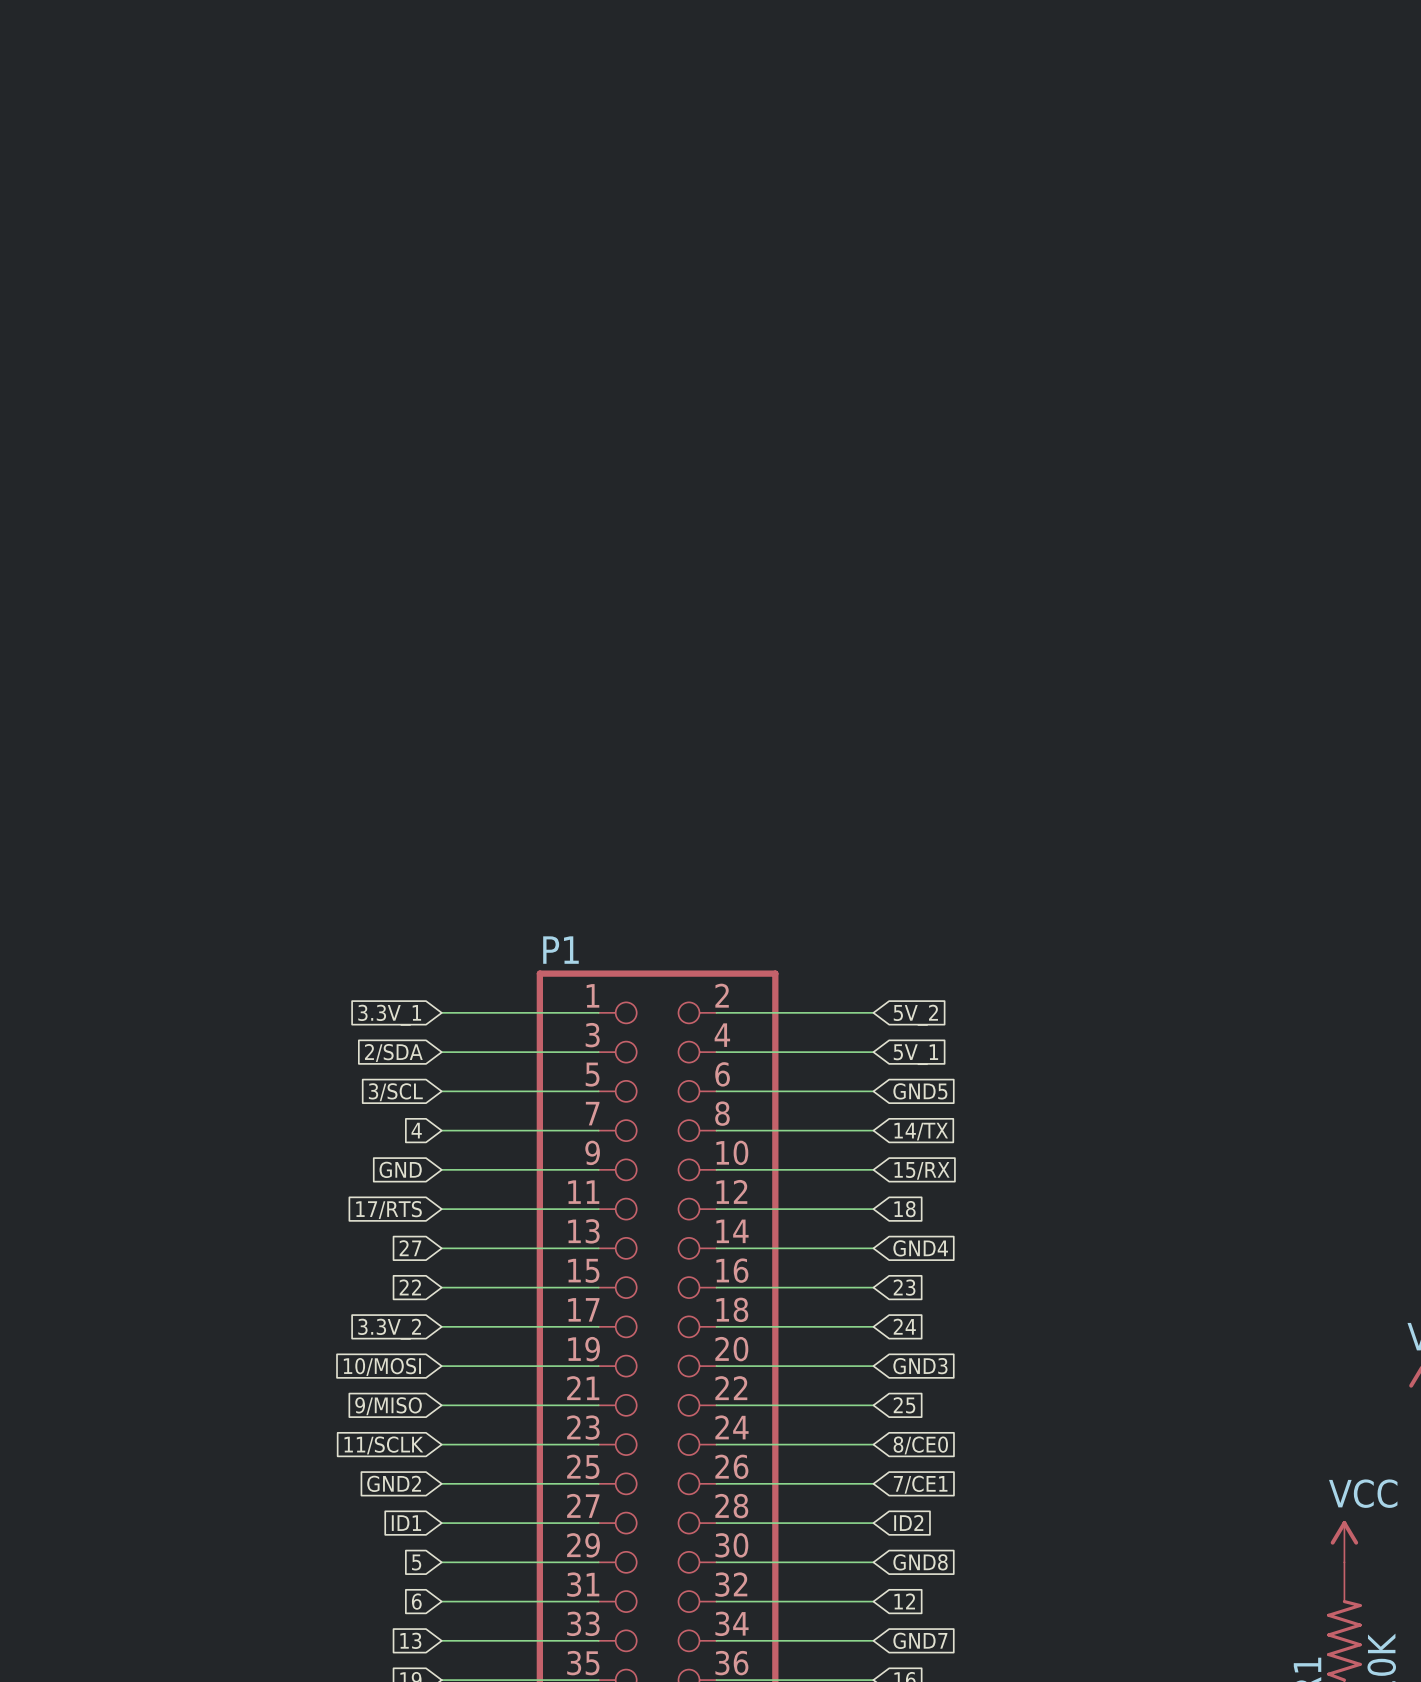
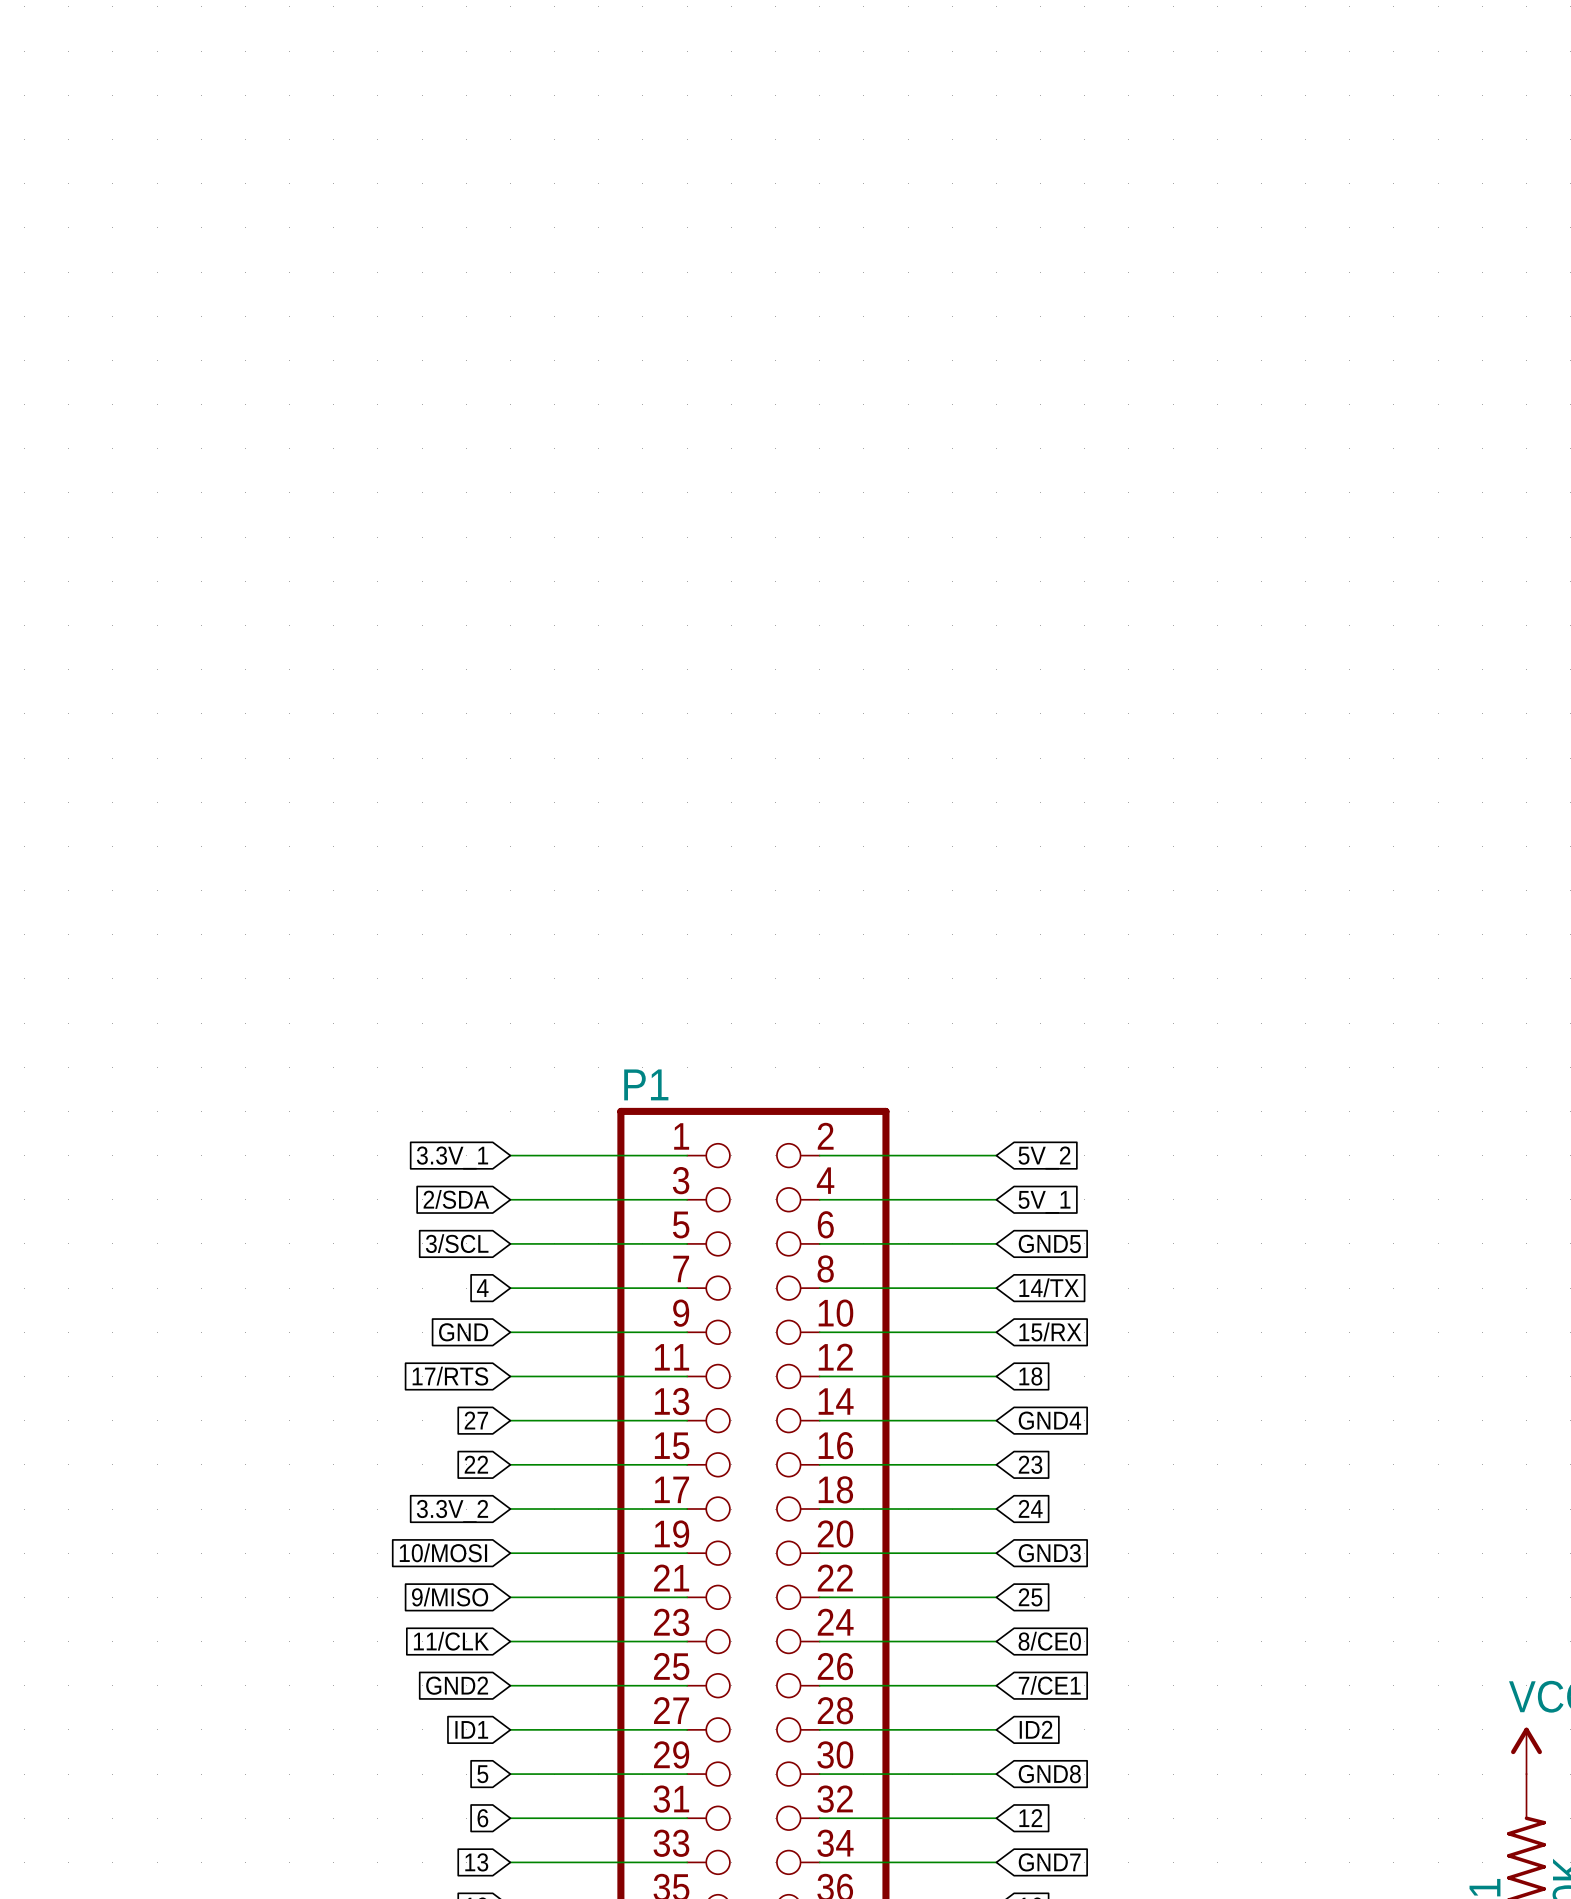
global label: 11/SCLK (383, 1445) -> 11/CLK (451, 1641)

